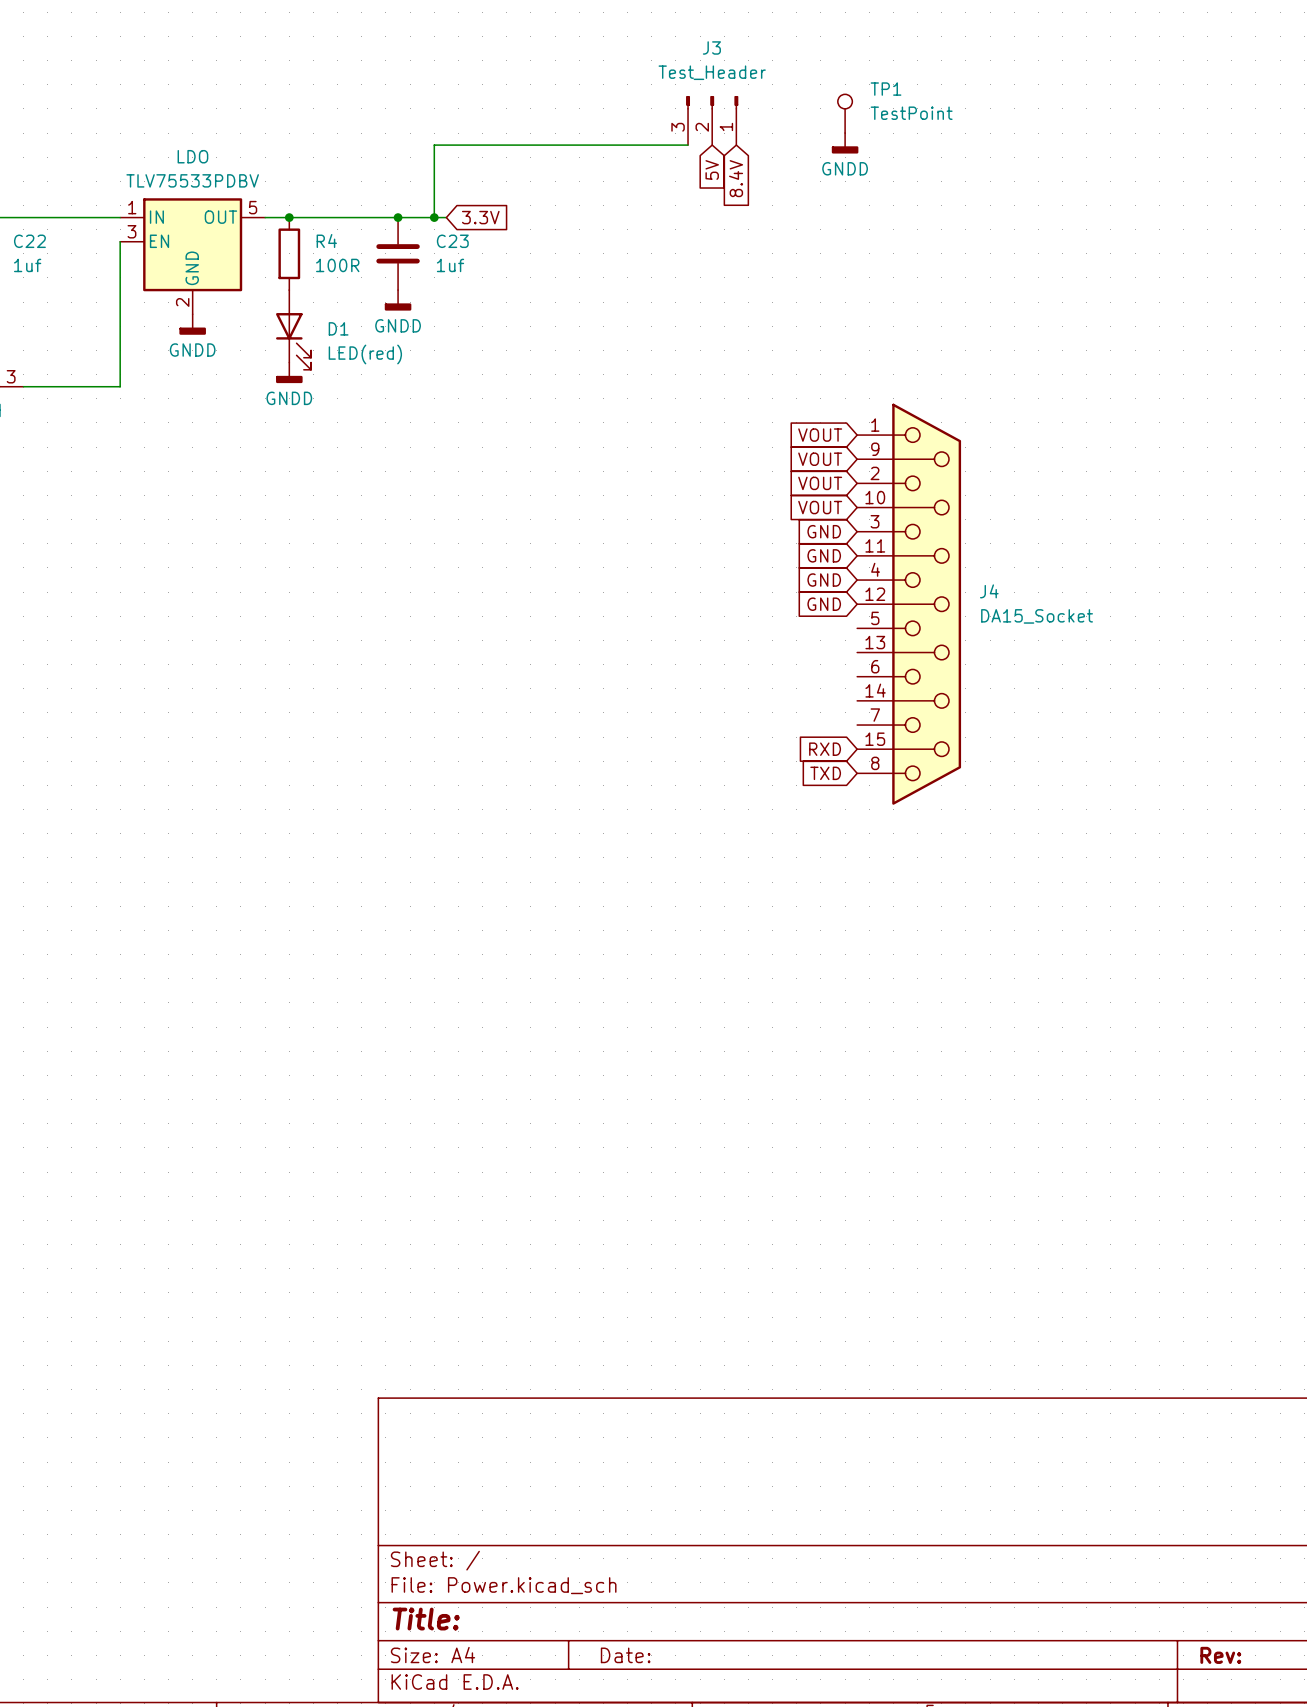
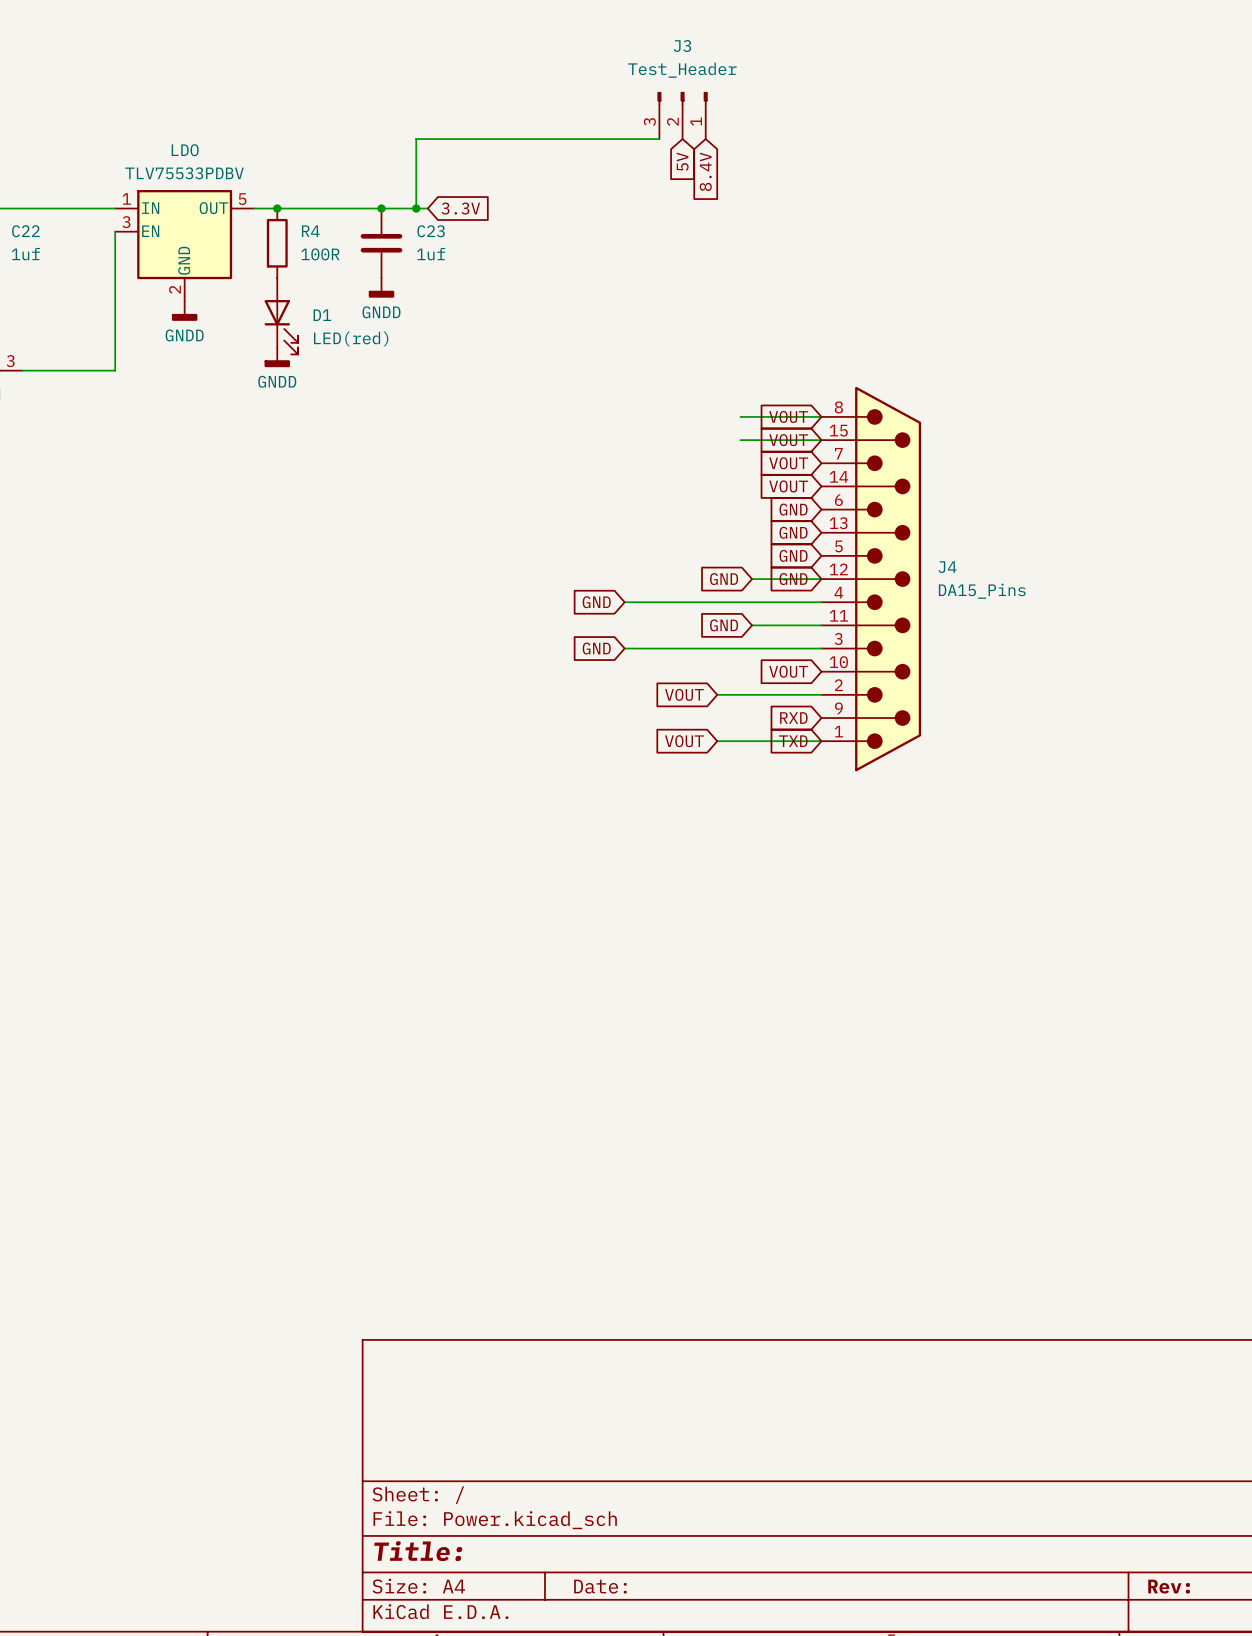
TP1: TestPoint (845, 113) -> none
power symbol: GNDD (845, 143) -> none
J4 symbol: [857, 403, 962, 805] -> [821, 386, 922, 772]
wire: none -> (740, 416) (821, 416)
wire: none -> (740, 440) (821, 440)
global label: none -> GND (724, 579)
wire: none -> (752, 579) (821, 579)
J4 value: DA15_Socket (1037, 616) -> DA15_Pins (982, 591)
global label: none -> GND (596, 602)
wire: none -> (624, 602) (821, 602)
global label: none -> GND (724, 625)
wire: none -> (752, 625) (821, 625)
global label: none -> GND (596, 648)
wire: none -> (624, 648) (821, 648)
global label: none -> VOUT (788, 671)
global label: none -> VOUT (684, 694)
wire: none -> (717, 694) (821, 694)
global label: none -> VOUT (684, 741)
wire: none -> (717, 741) (821, 741)

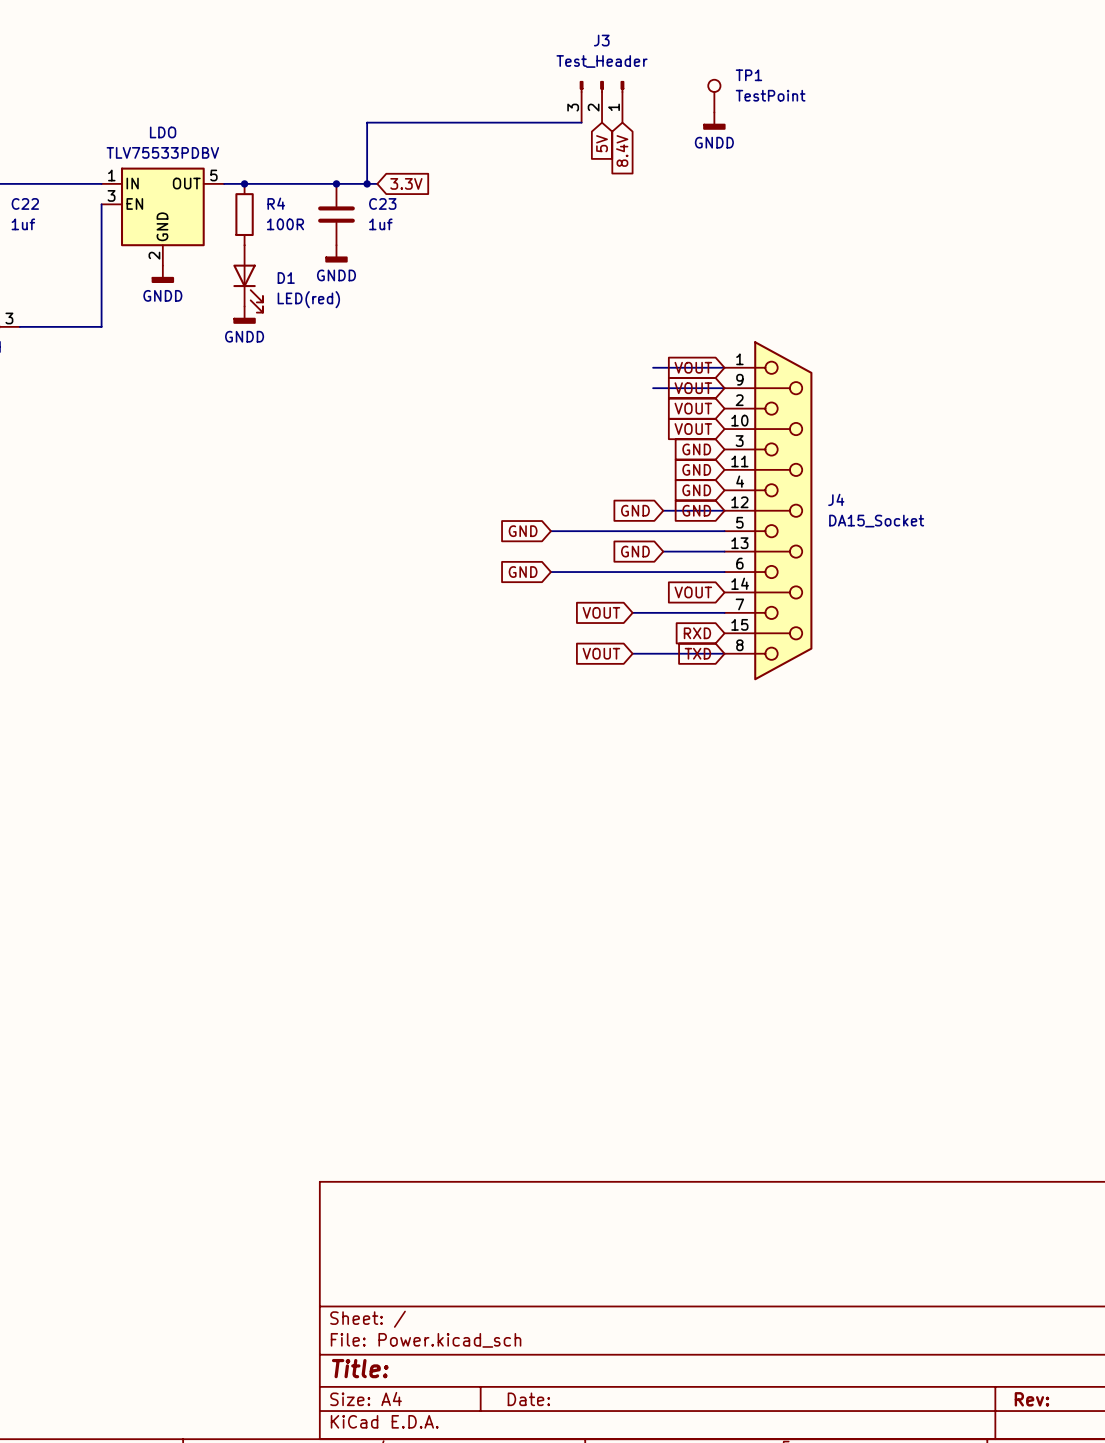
TP1: none -> TestPoint (714, 96)
power symbol: none -> GNDD (714, 121)
J4 symbol: [821, 386, 922, 772] -> [724, 341, 813, 681]
J4 value: DA15_Pins (982, 591) -> DA15_Socket (876, 521)

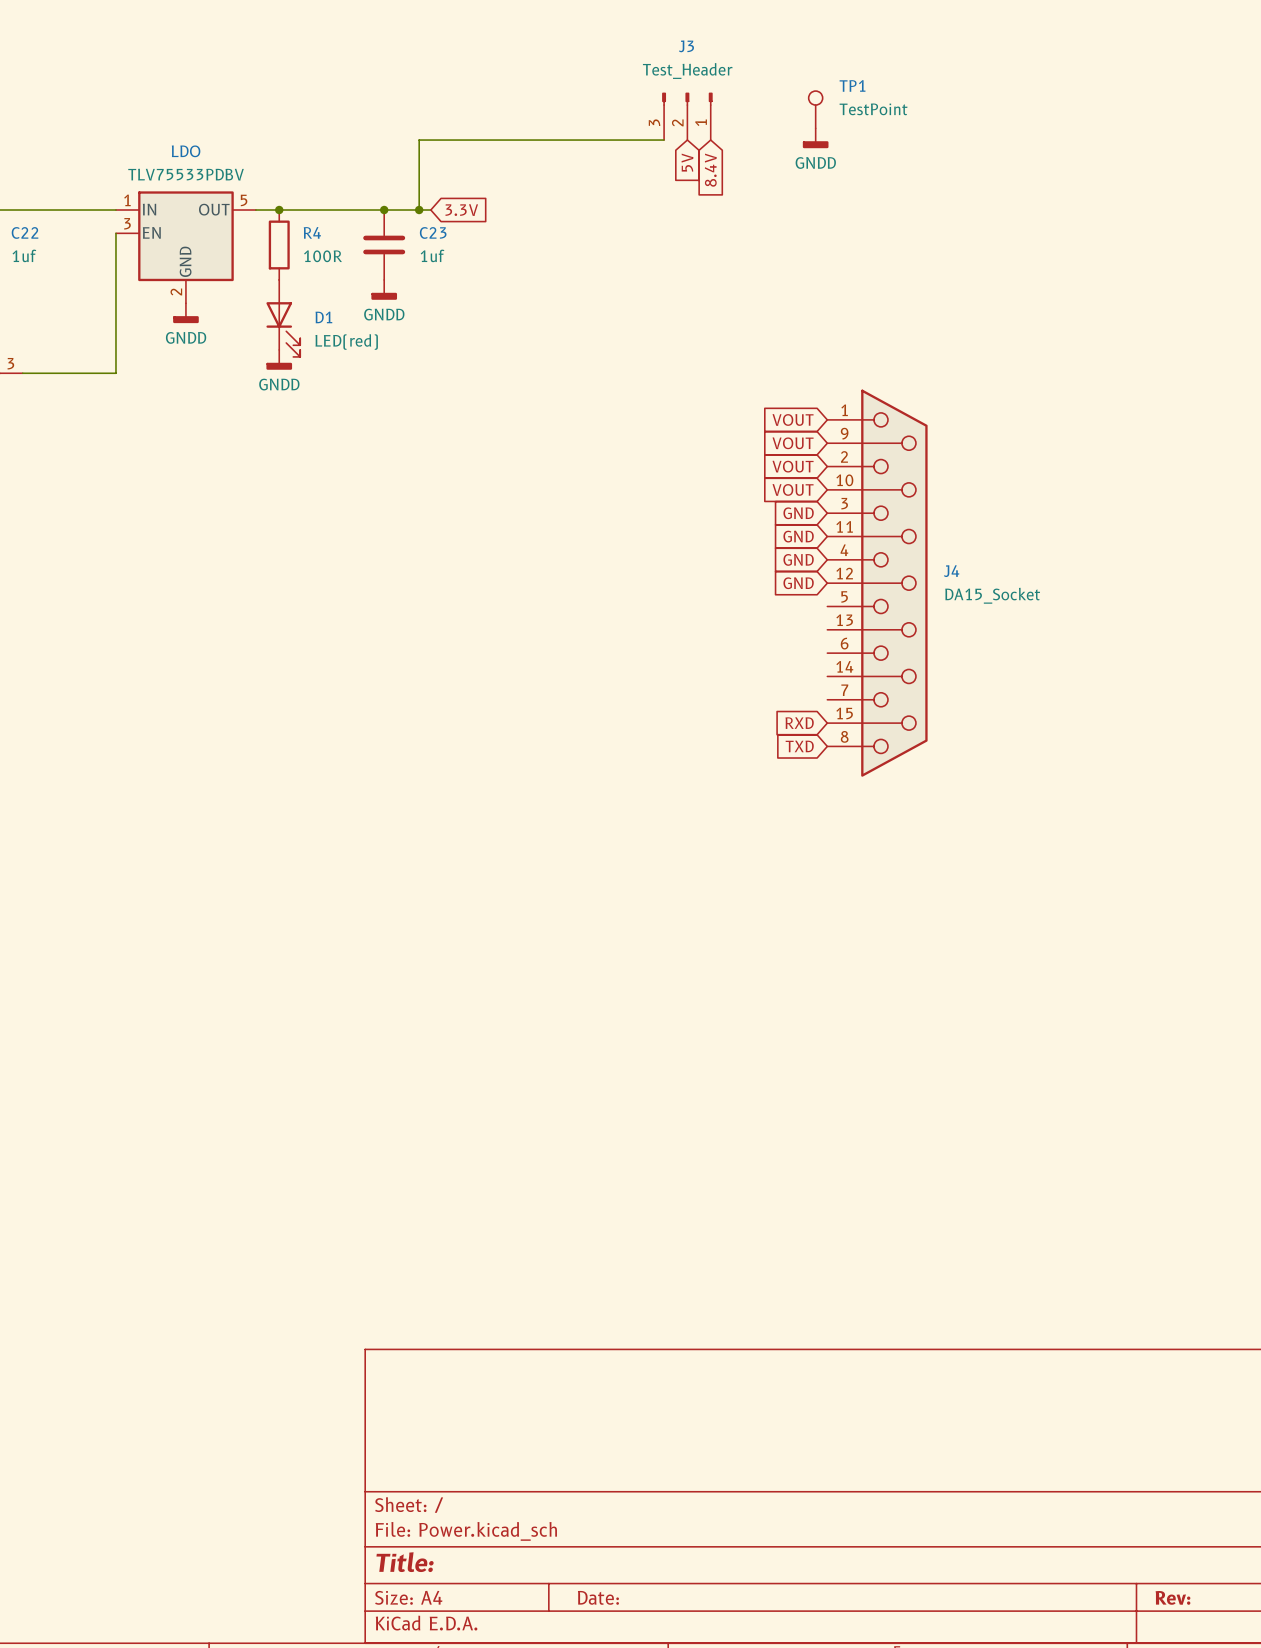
wire: (653, 367) (724, 367) -> none
wire: (653, 388) (724, 388) -> none
global label: GND (635, 510) -> none
wire: (663, 510) (724, 510) -> none
global label: GND (523, 531) -> none
wire: (550, 531) (724, 531) -> none
global label: GND (635, 551) -> none
wire: (663, 551) (724, 551) -> none
global label: GND (523, 572) -> none
wire: (550, 572) (724, 572) -> none
global label: VOUT (693, 592) -> none
global label: VOUT (601, 612) -> none
wire: (632, 612) (724, 612) -> none
global label: VOUT (601, 653) -> none
wire: (632, 653) (724, 653) -> none

